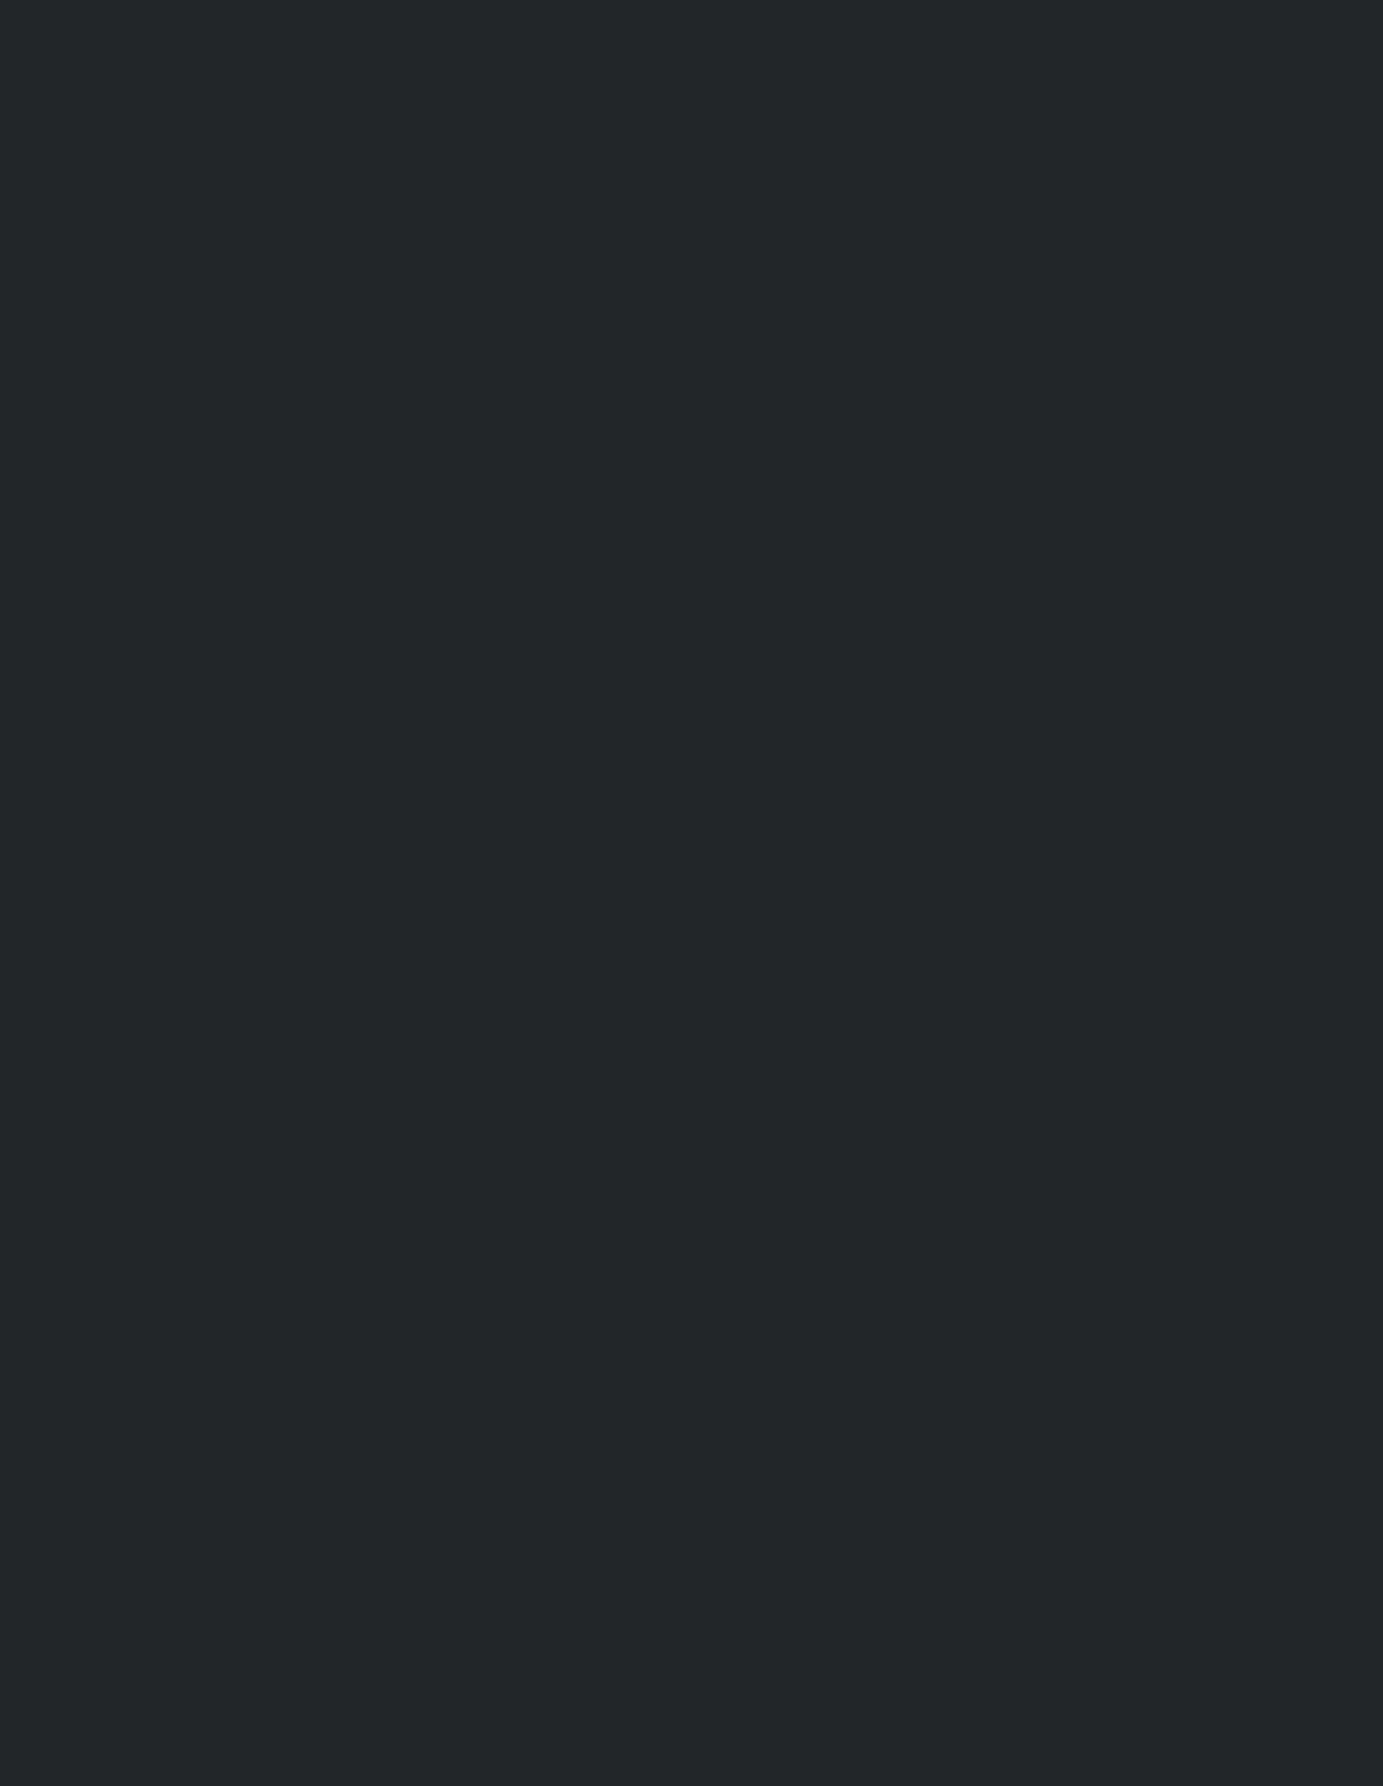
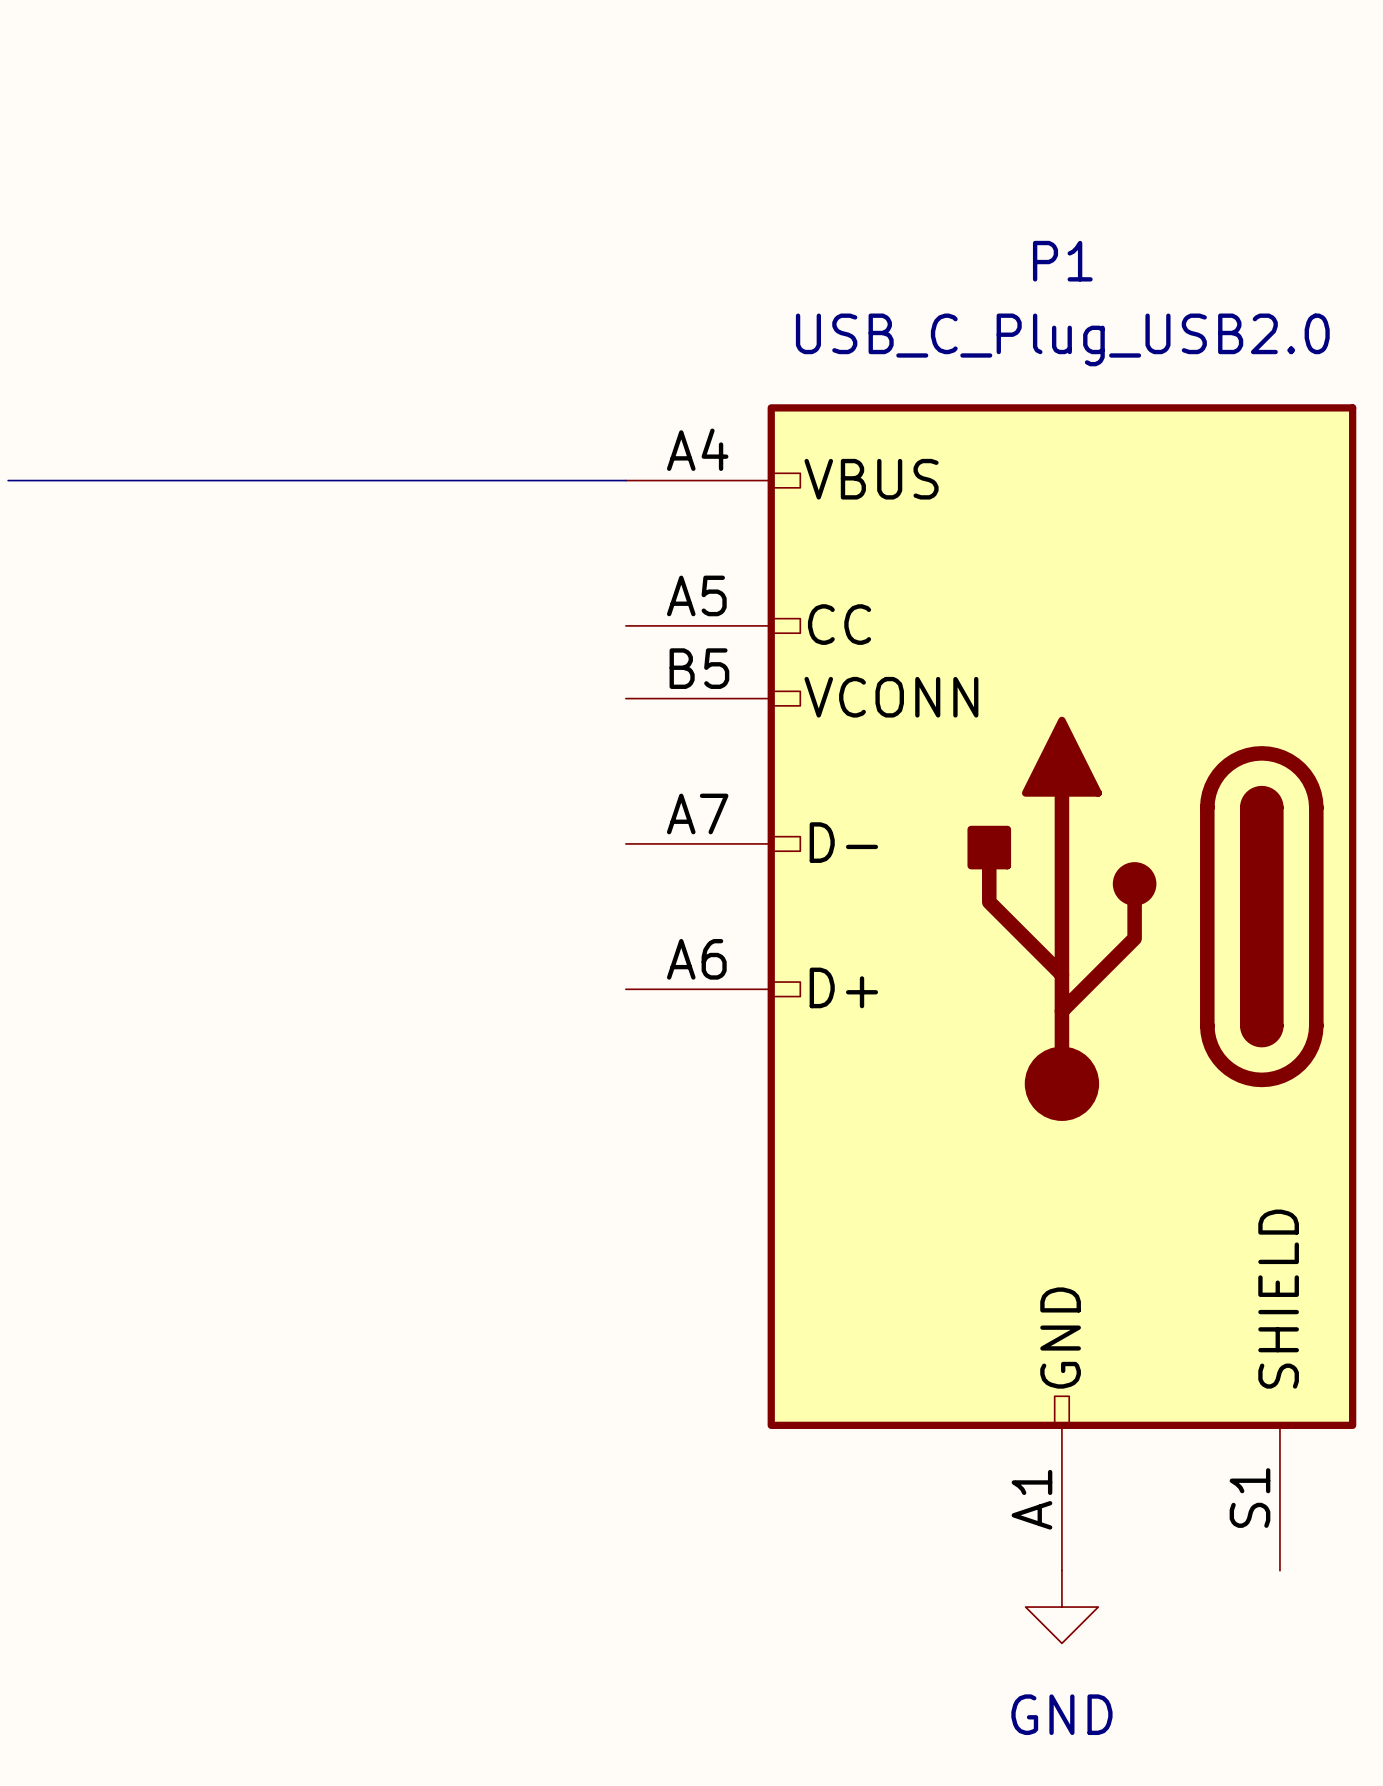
wire: none -> (8, 480) (625, 480)
P1: none -> USB_C_Plug_USB2.0 (991, 987)
power symbol: none -> GND (1061, 1607)

